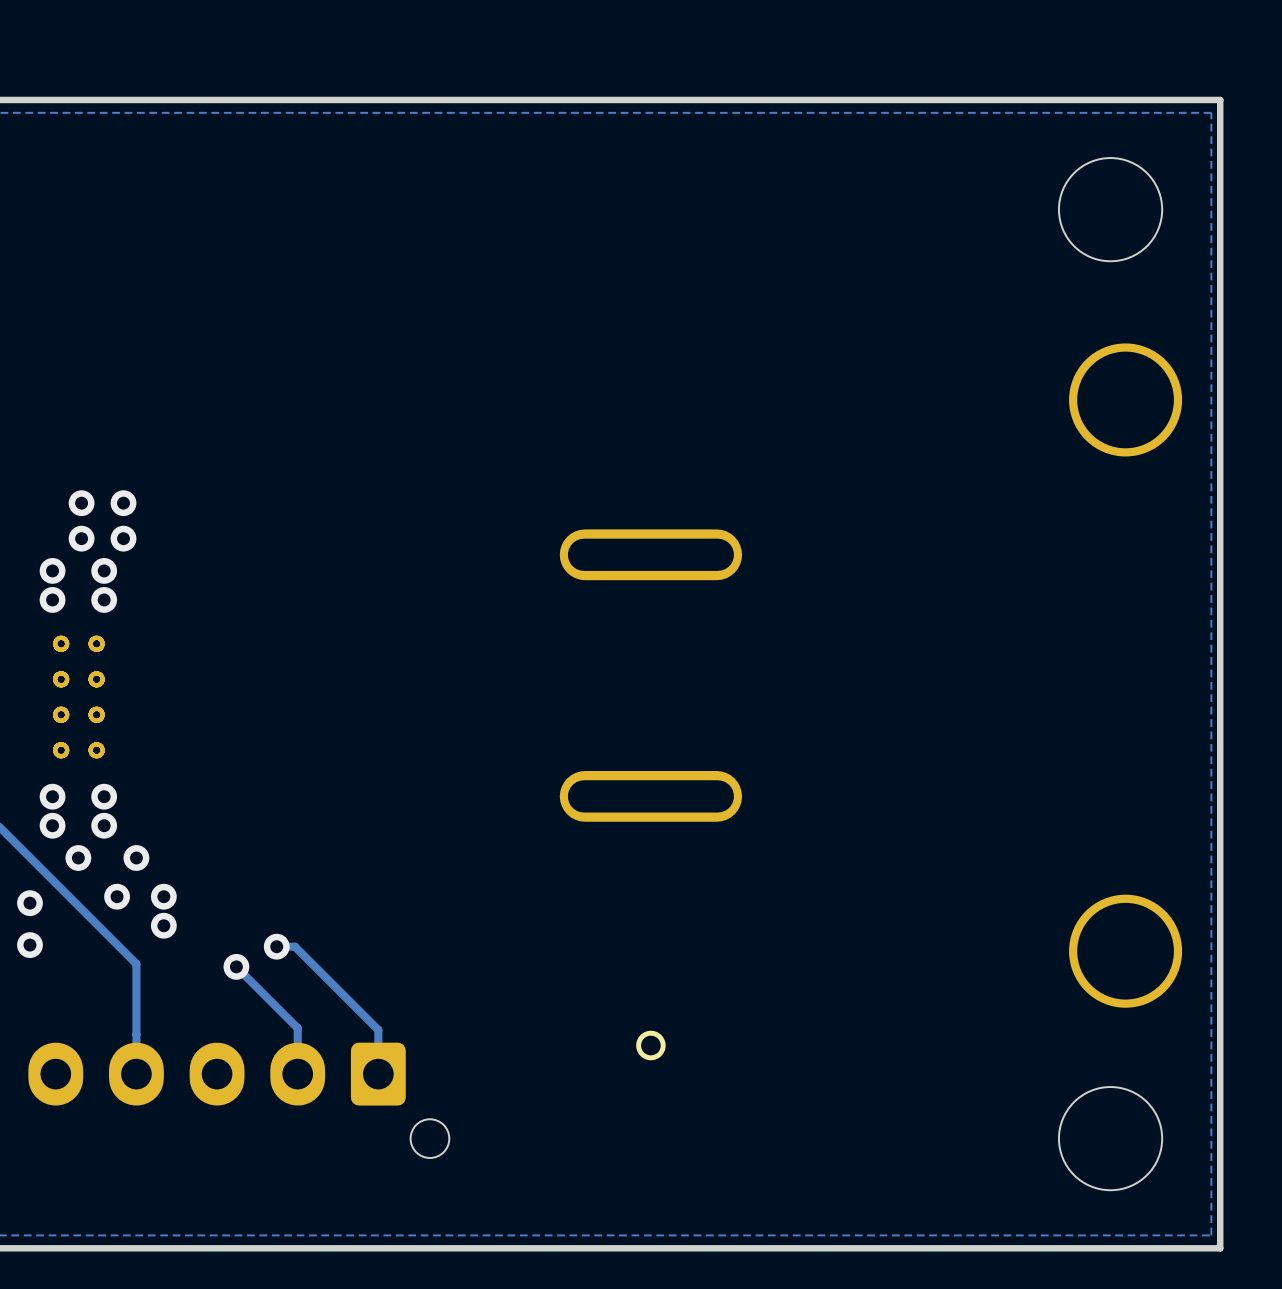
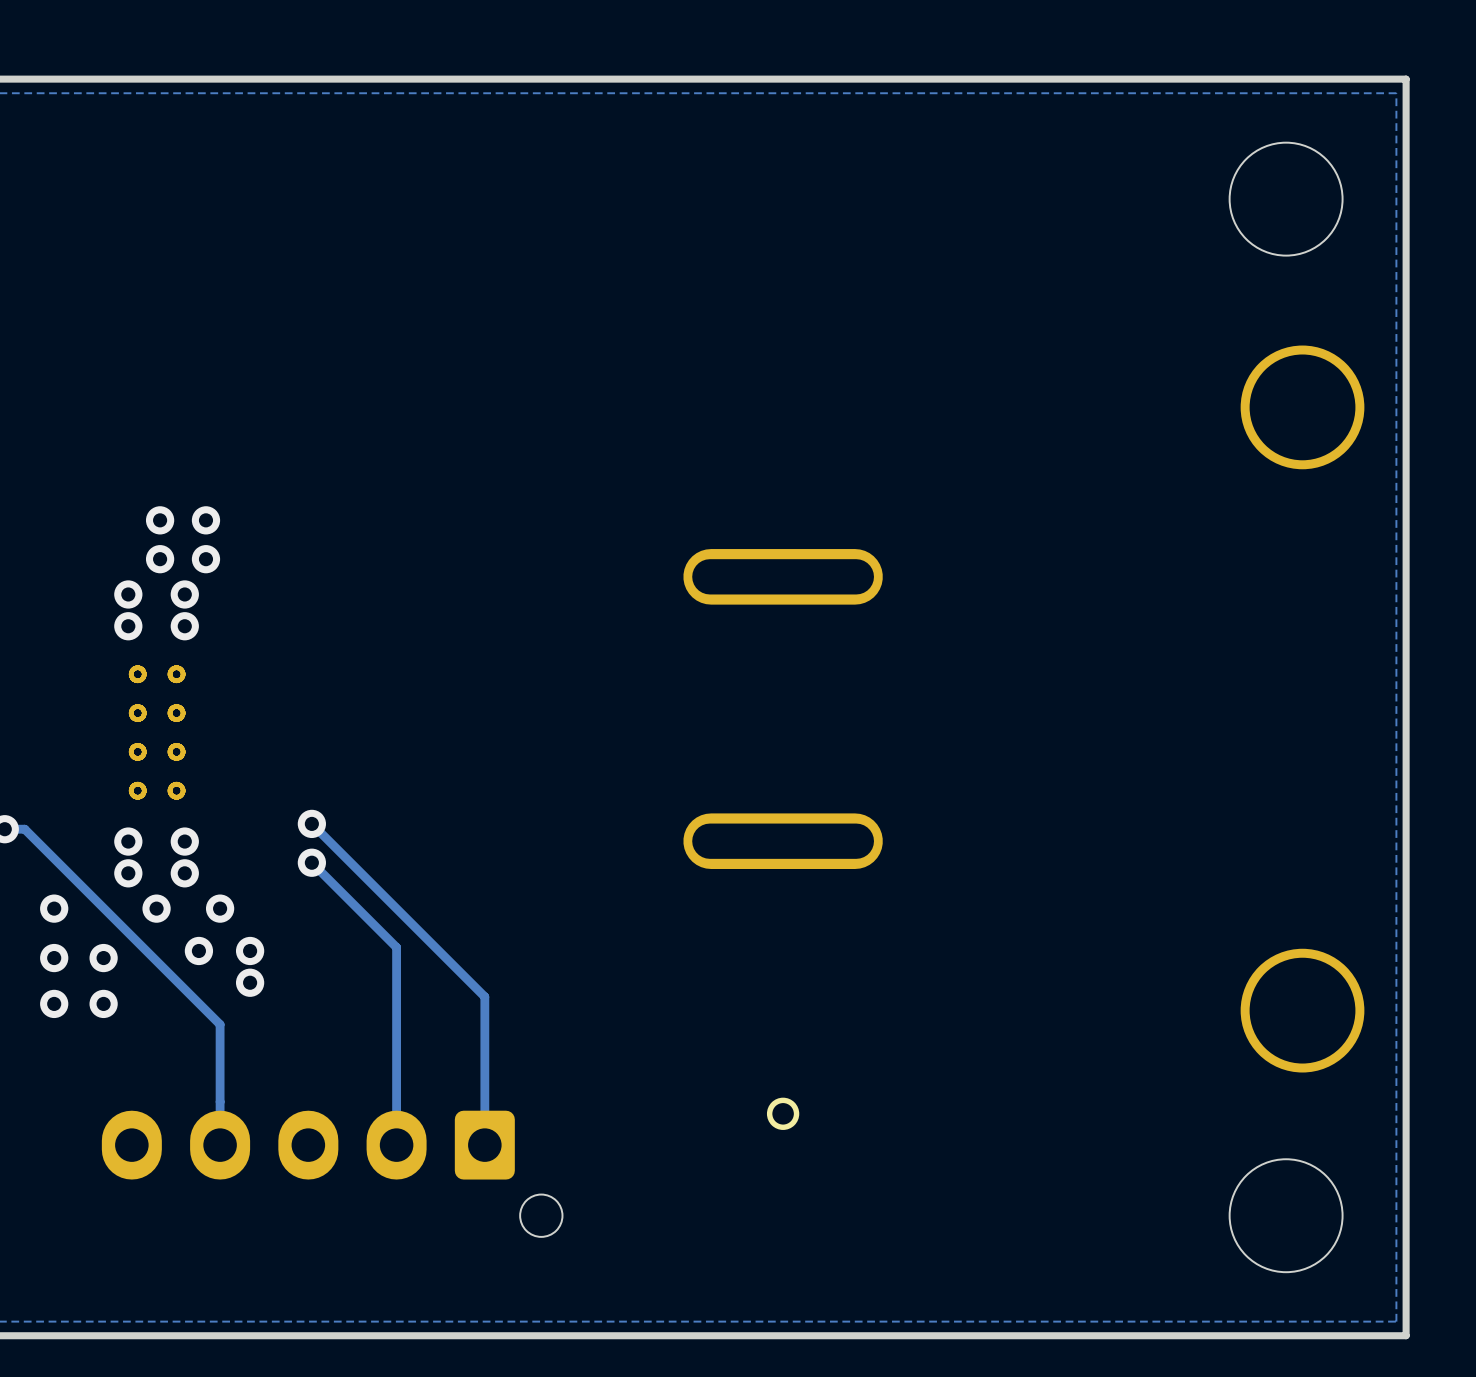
via: none -> (311, 823)
via: none -> (311, 862)
track: (276, 946) (294, 946) (378, 1030) -> (311, 823) (484, 996) (484, 1096)
via: (276, 946) -> none
track: (236, 966) (297, 1028) -> (311, 862) (396, 947) (396, 1094)
via: (236, 966) -> none

